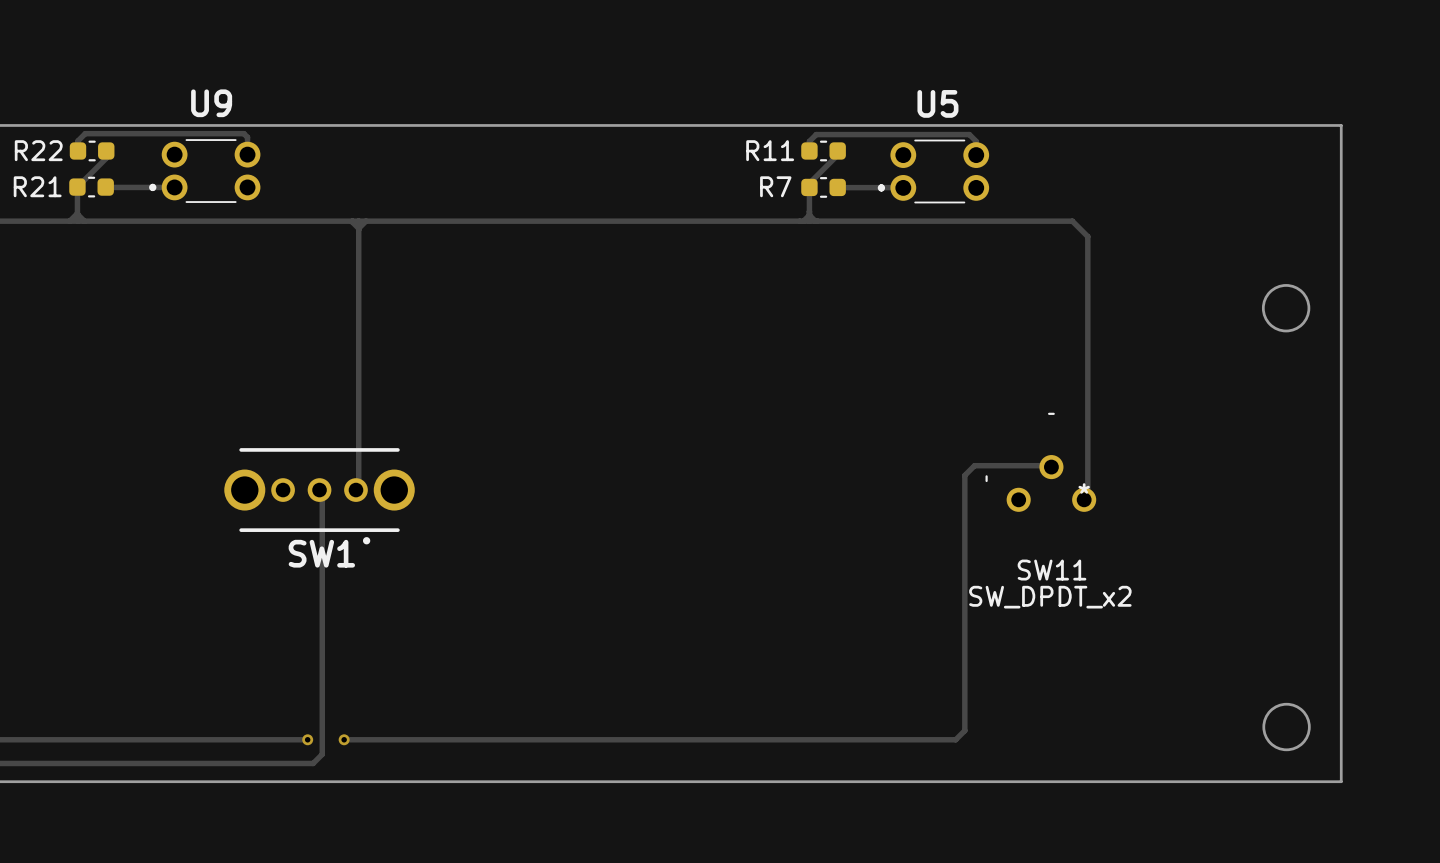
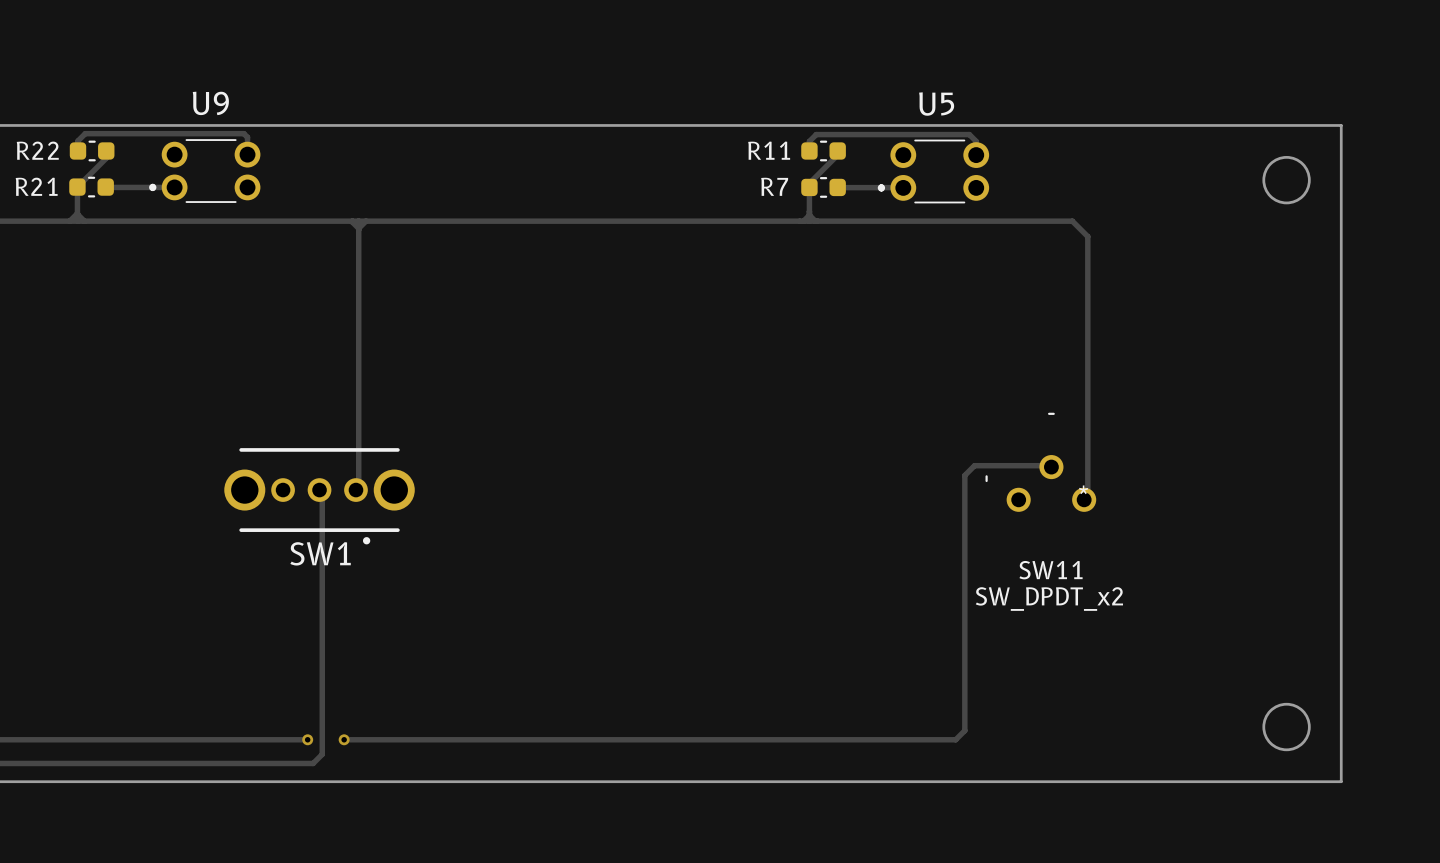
round board edge position: (1286, 308) -> (1286, 180)

